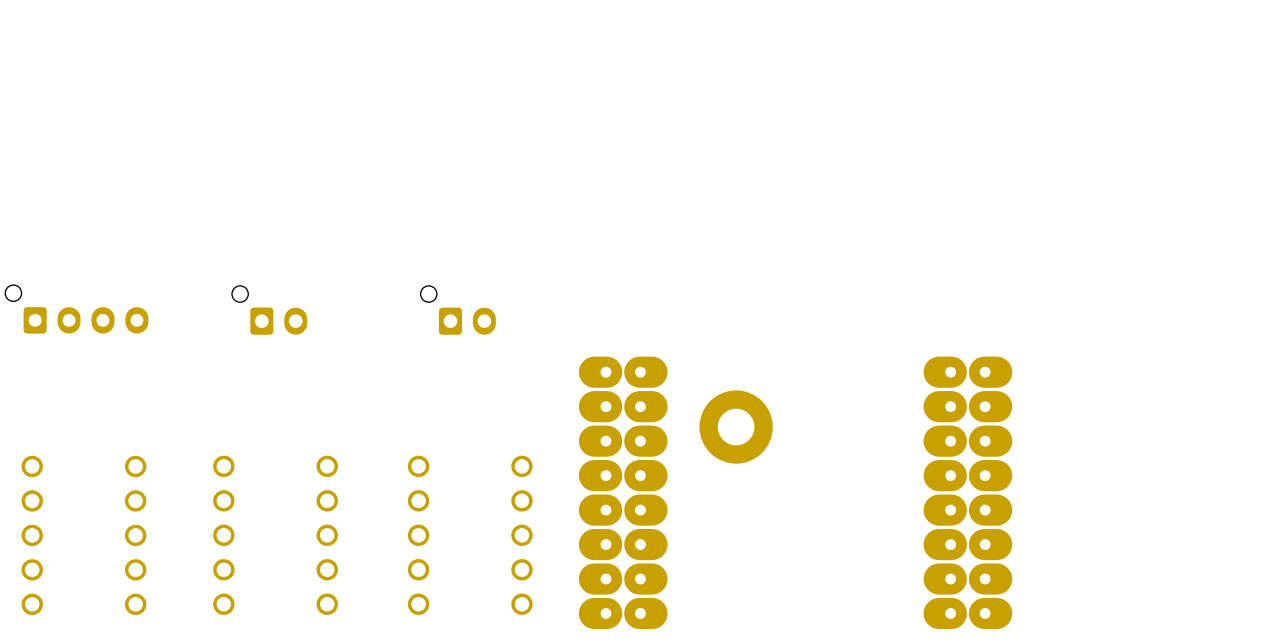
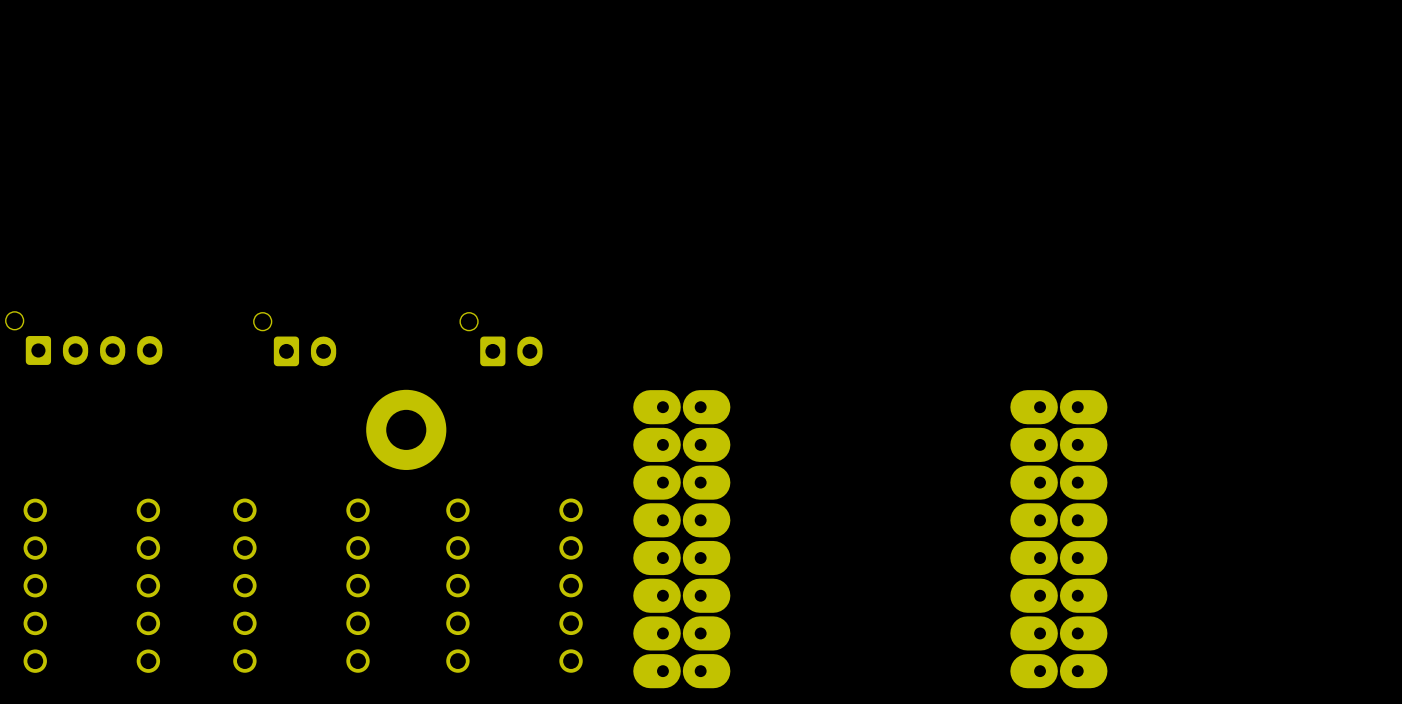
part: none -> (406, 429)
part: (736, 427) -> none

